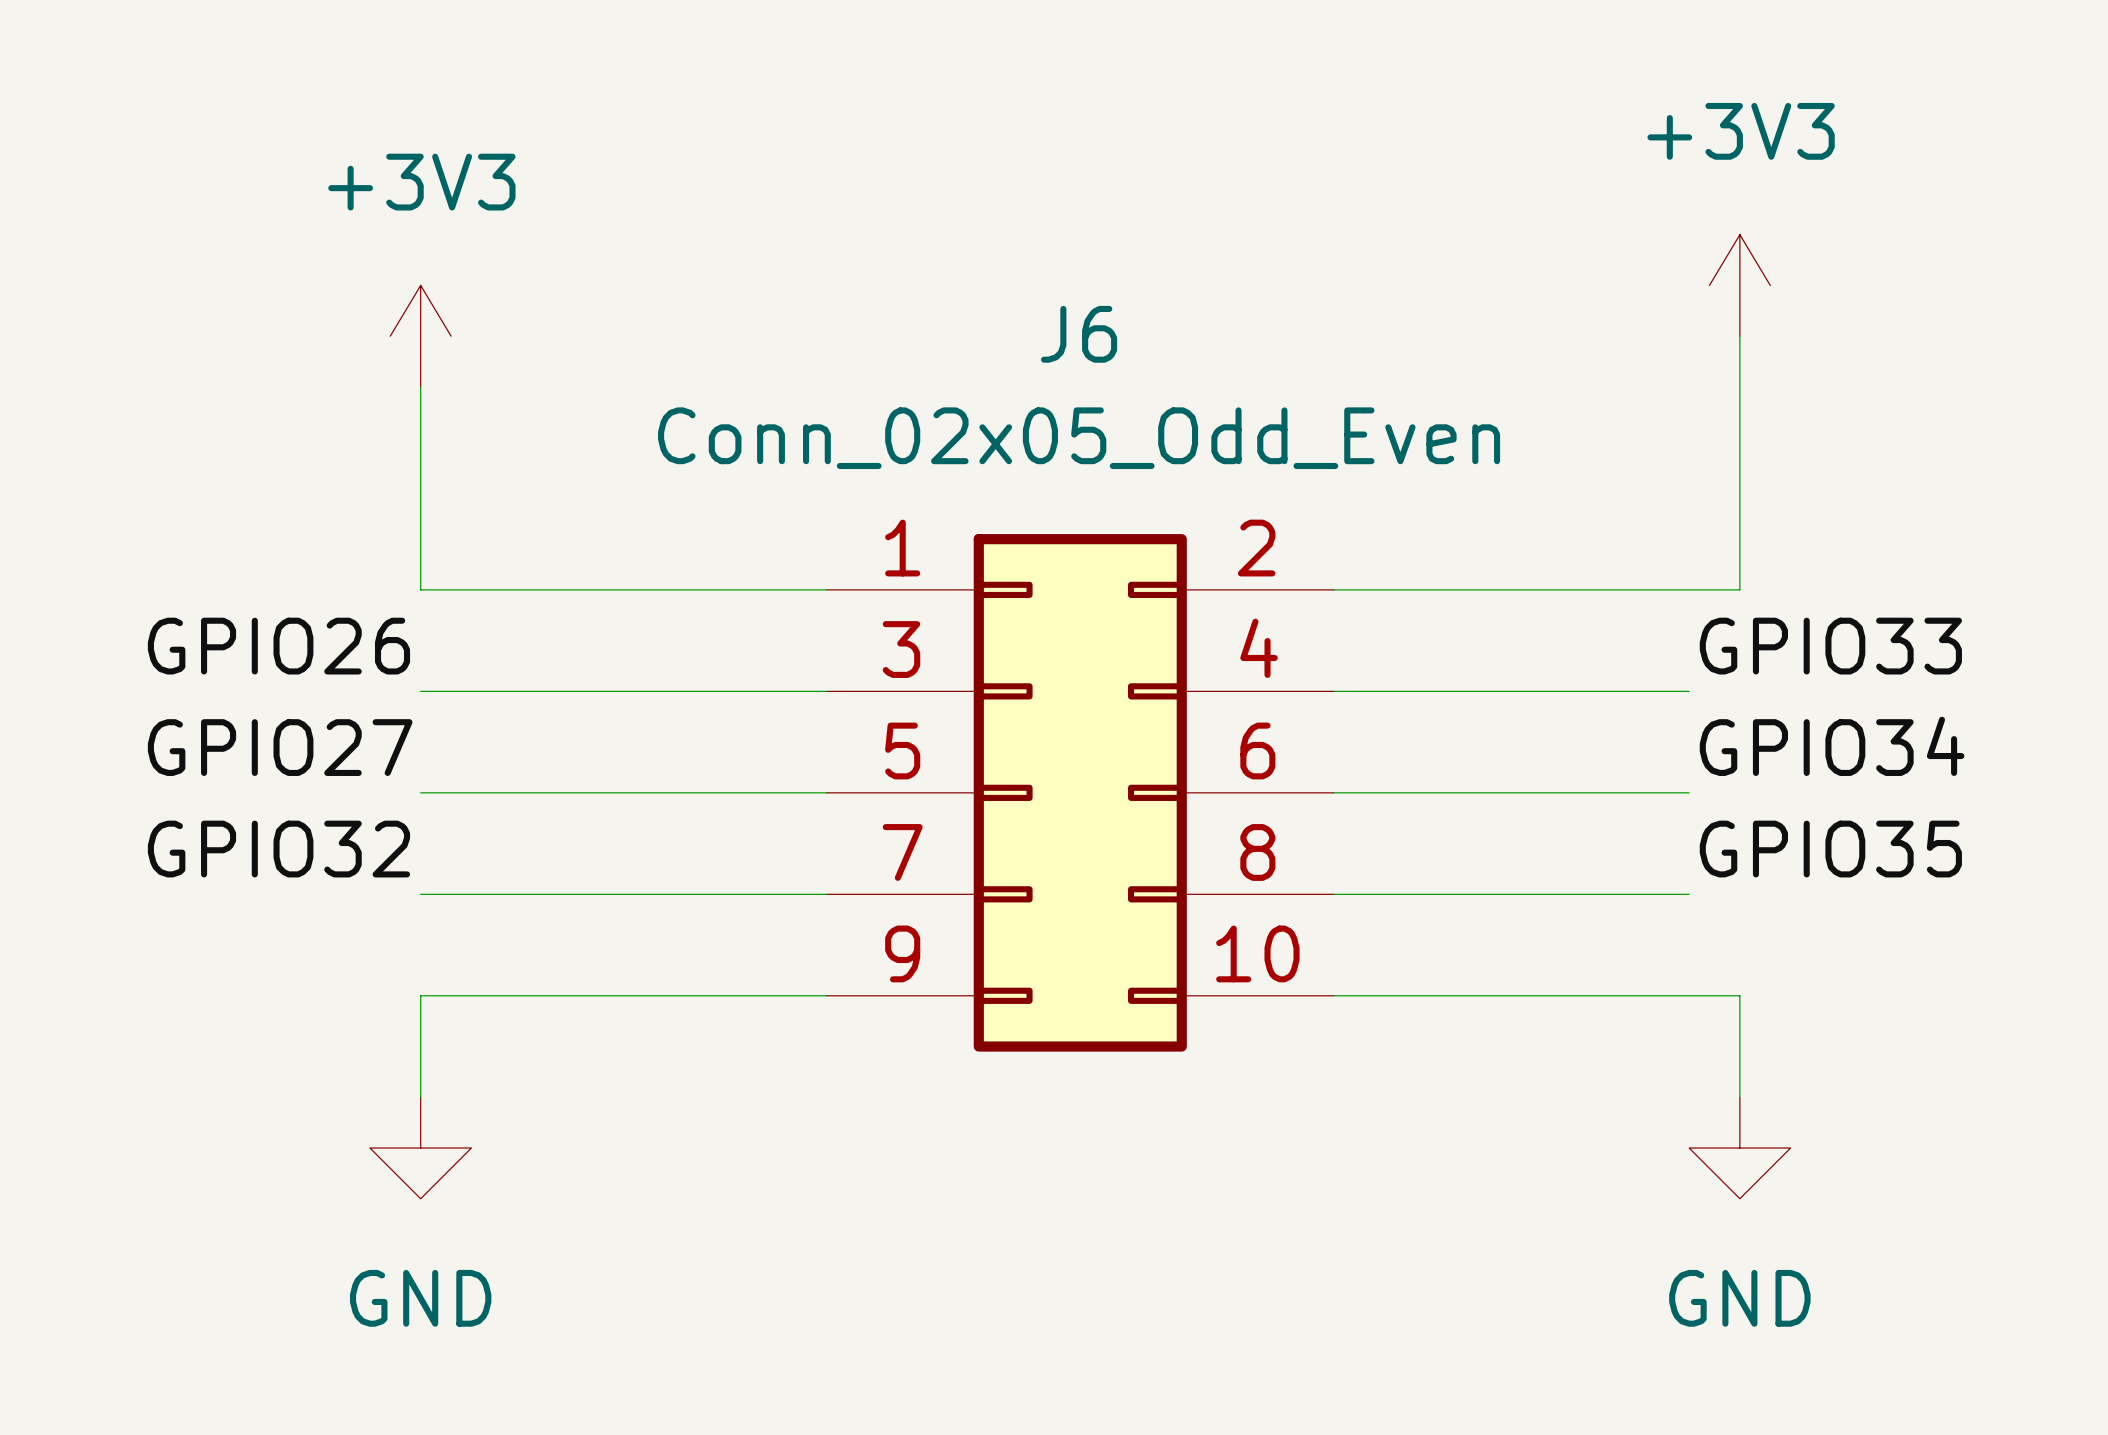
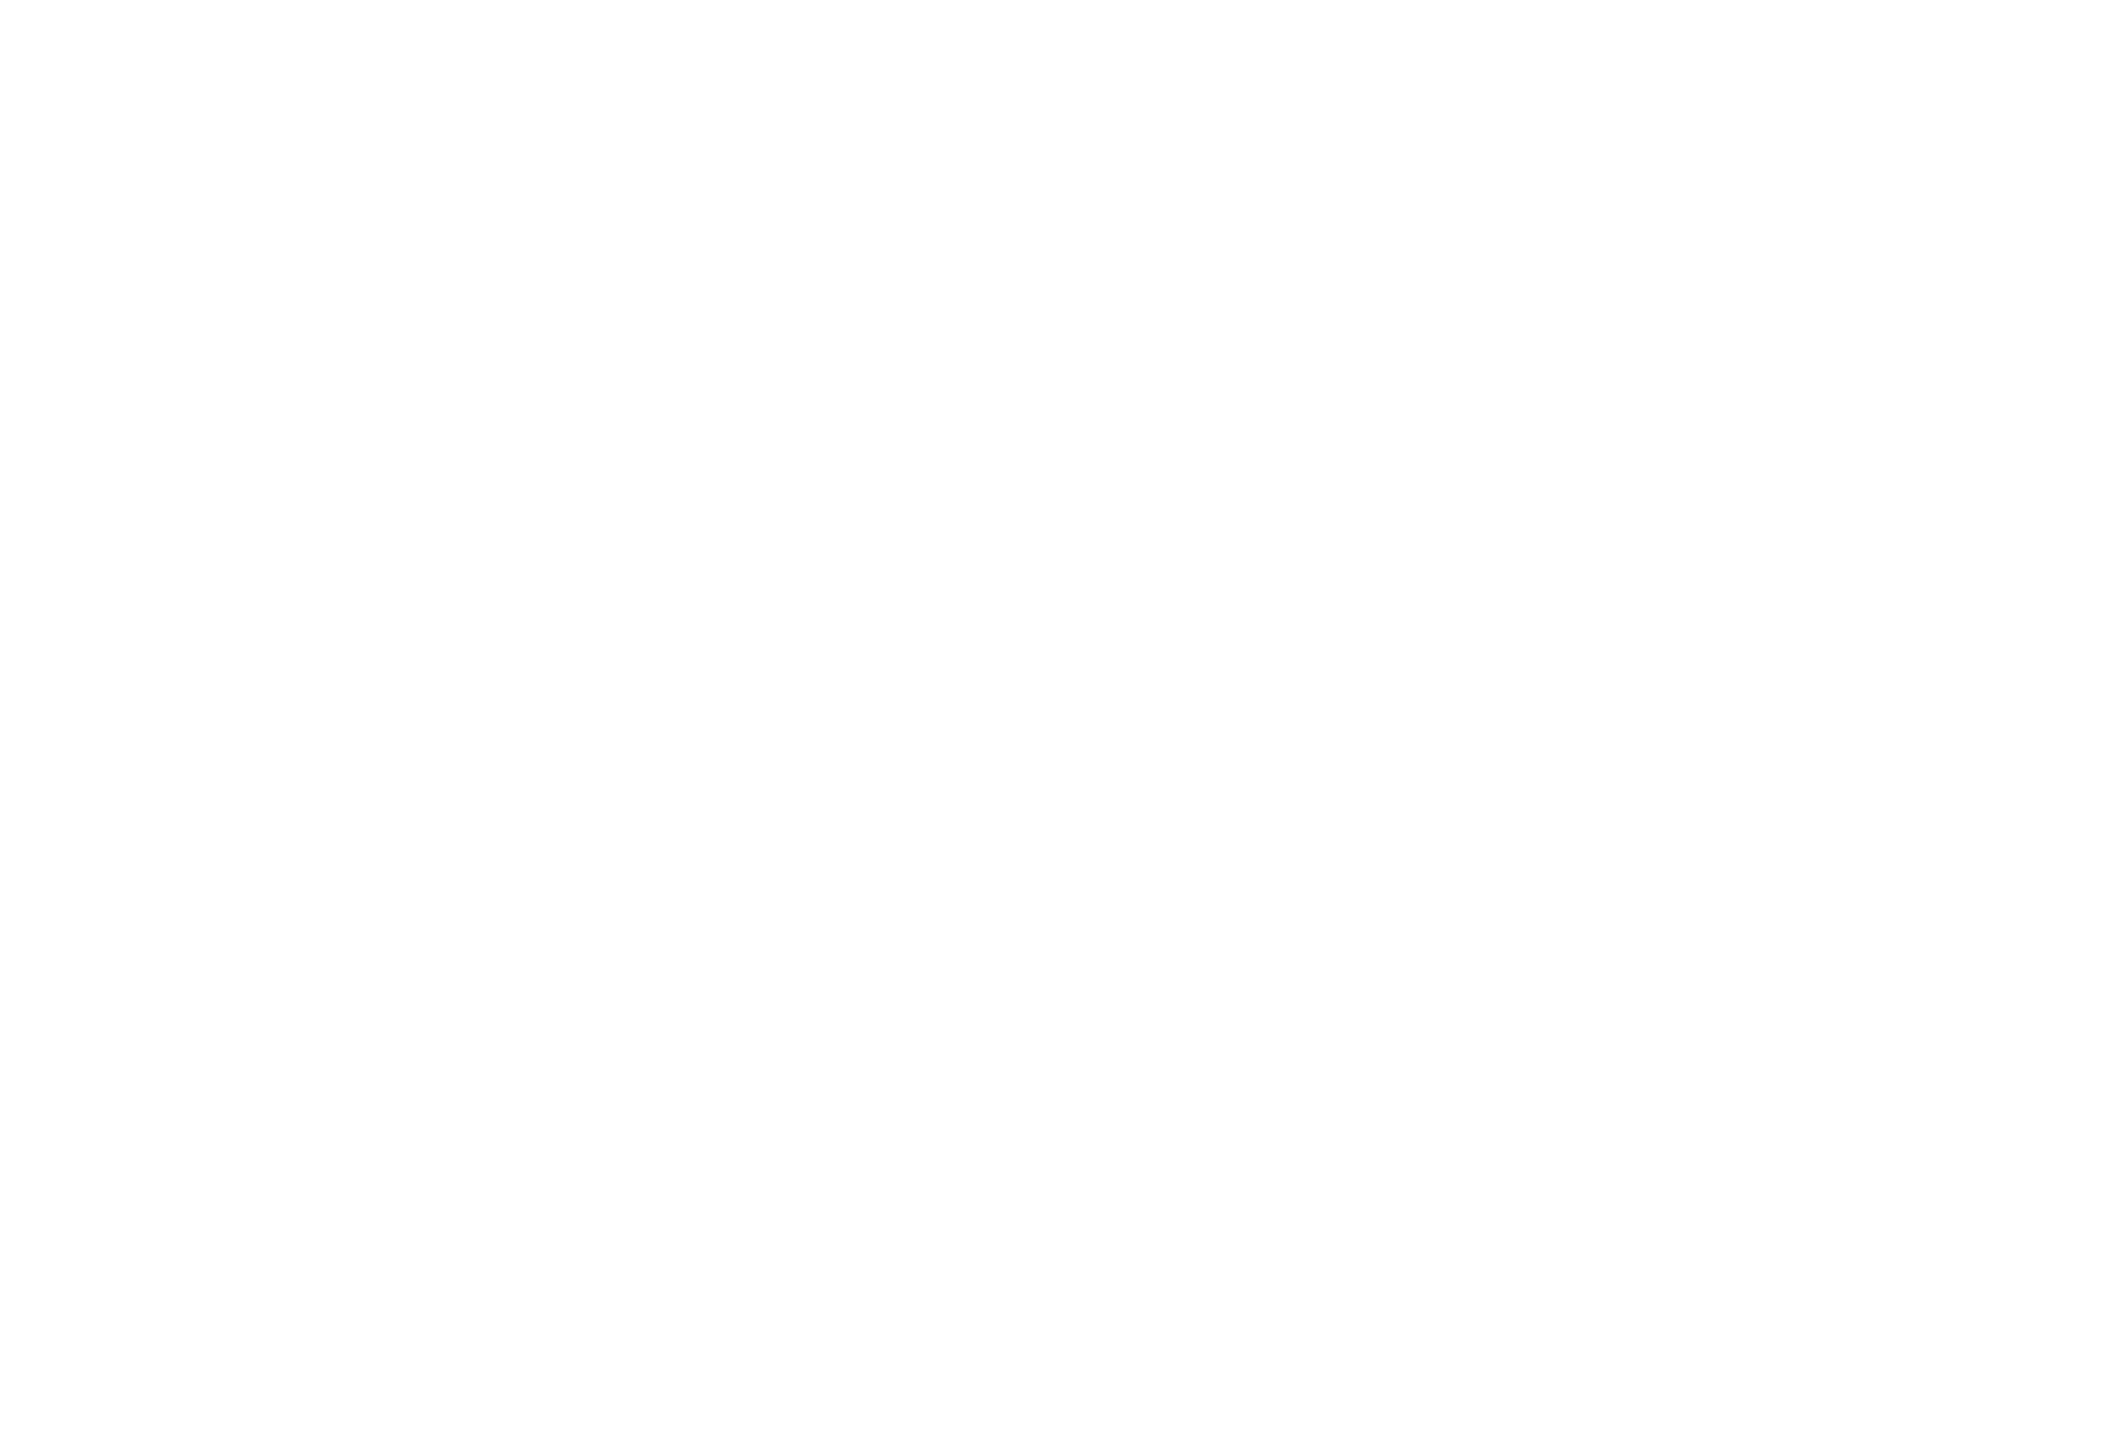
power symbol: +3V3 (1739, 285) -> none
power symbol: +3V3 (420, 336) -> none
wire: (1739, 336) (1739, 589) (1333, 589) -> none
wire: (420, 386) (420, 589) (826, 589) -> none
label: GPIO26 (278, 646) -> none
label: GPIO33 (1830, 646) -> none
wire: (420, 691) (826, 691) -> none
wire: (1333, 691) (1689, 691) -> none
label: GPIO34 (1832, 746) -> none
label: GPIO27 (280, 747) -> none
wire: (420, 792) (826, 792) -> none
J6: Conn_02x05_Odd_Even (1080, 792) -> none
wire: (1333, 792) (1689, 792) -> none
label: GPIO32 (278, 849) -> none
label: GPIO35 (1830, 849) -> none
wire: (420, 894) (826, 894) -> none
wire: (1333, 894) (1689, 894) -> none
wire: (826, 995) (420, 995) (420, 1097) -> none
wire: (1333, 995) (1739, 995) (1739, 1097) -> none
power symbol: GND (420, 1148) -> none
power symbol: GND (1739, 1148) -> none

